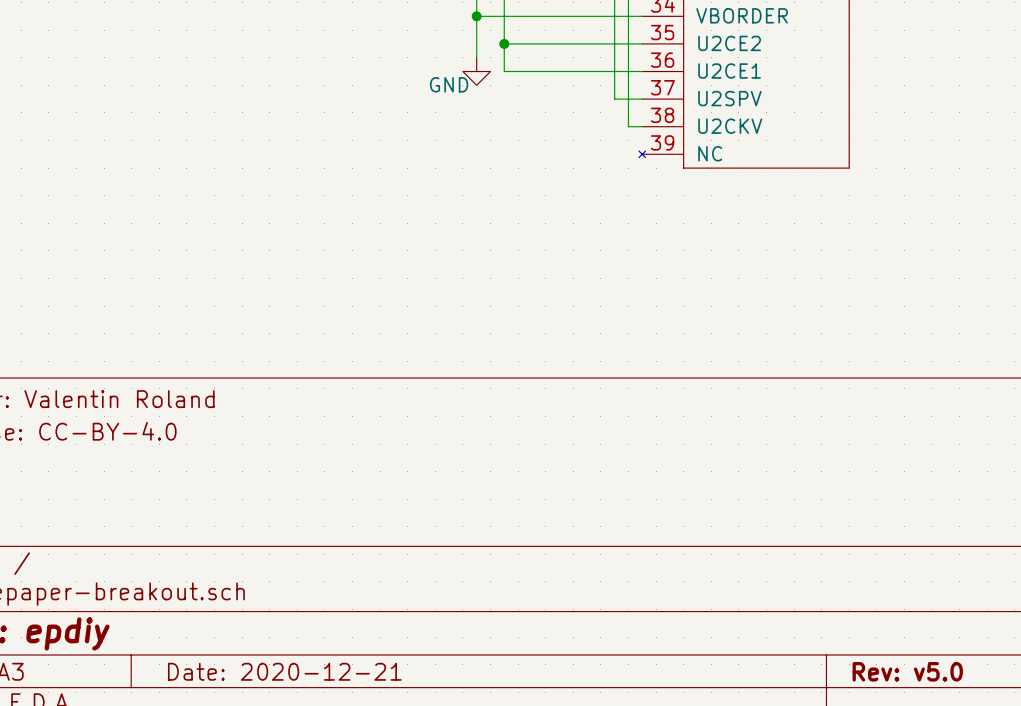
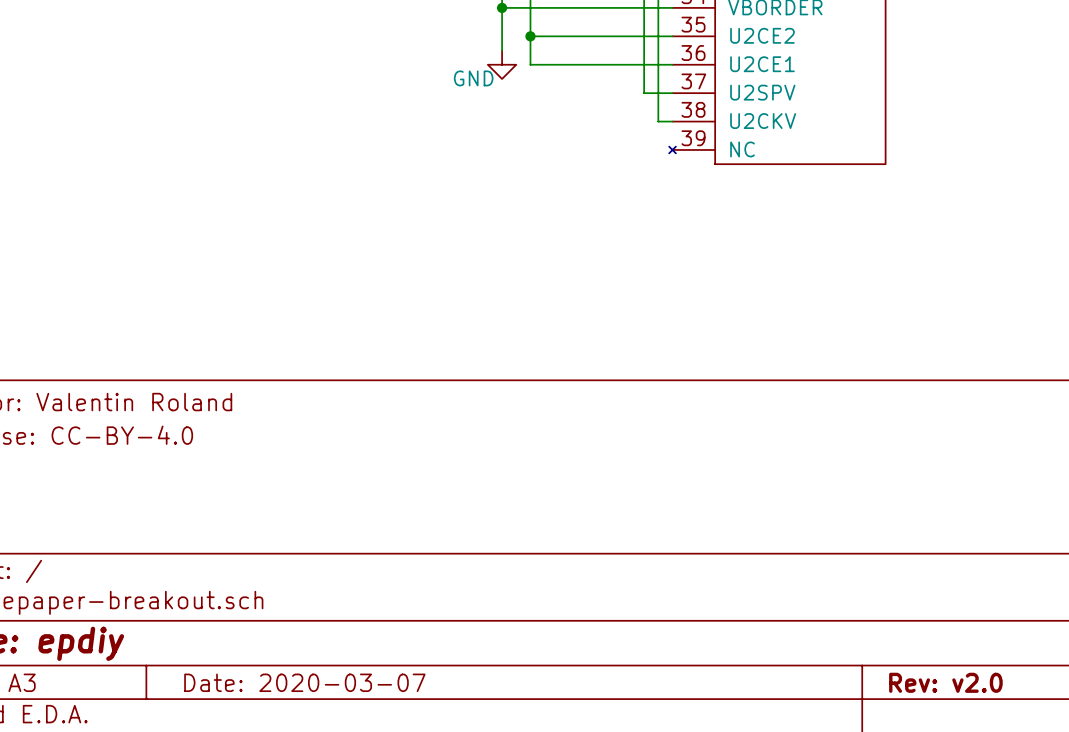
title block: Date: 2020-12-21 (284, 671) -> Date: 2020-03-07 (304, 682)
title block: Rev: v5.0 (907, 671) -> Rev: v2.0 (945, 682)

